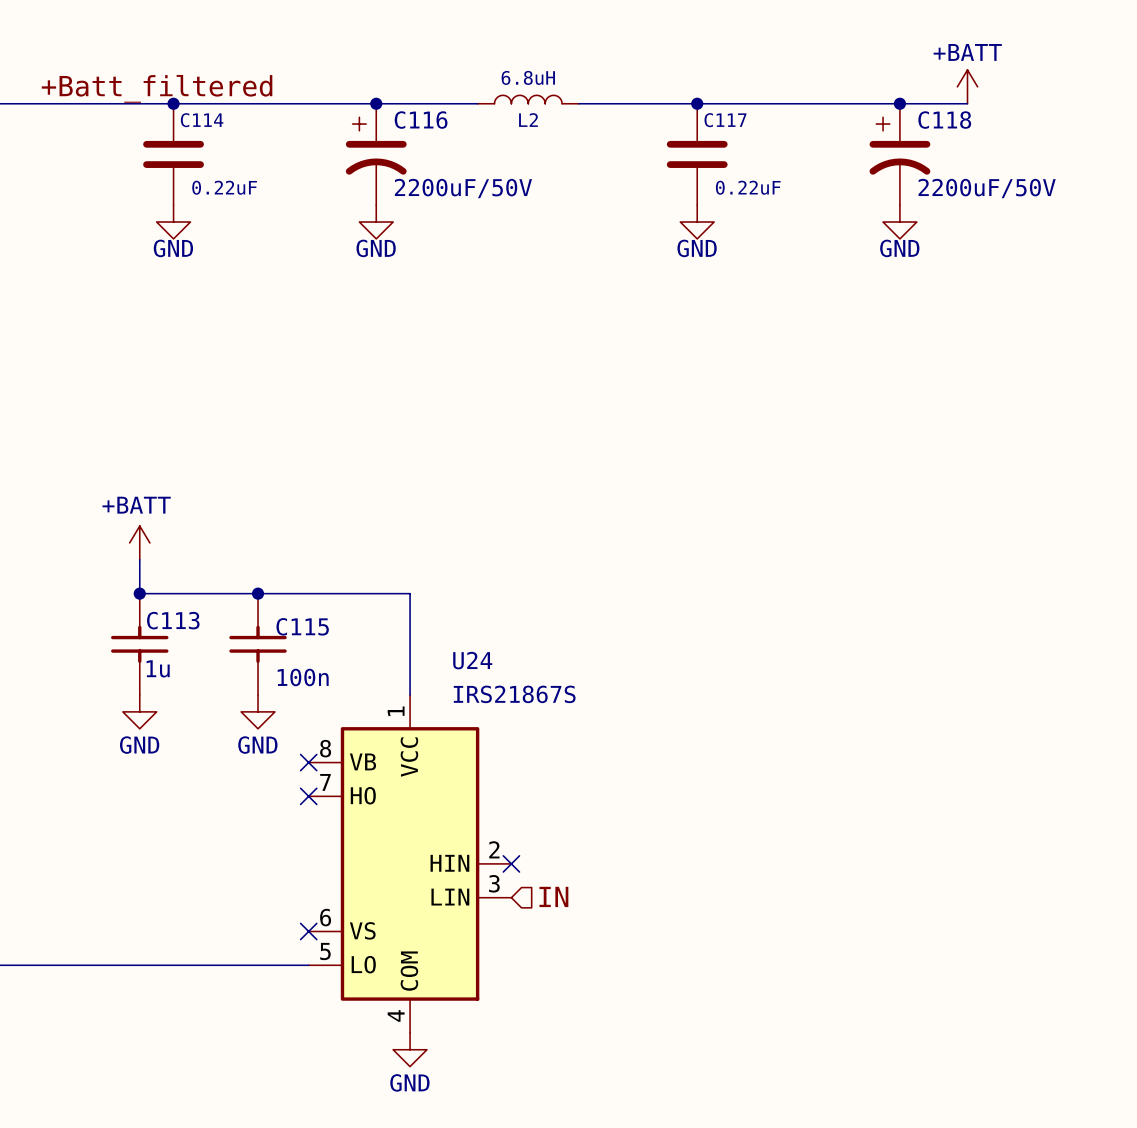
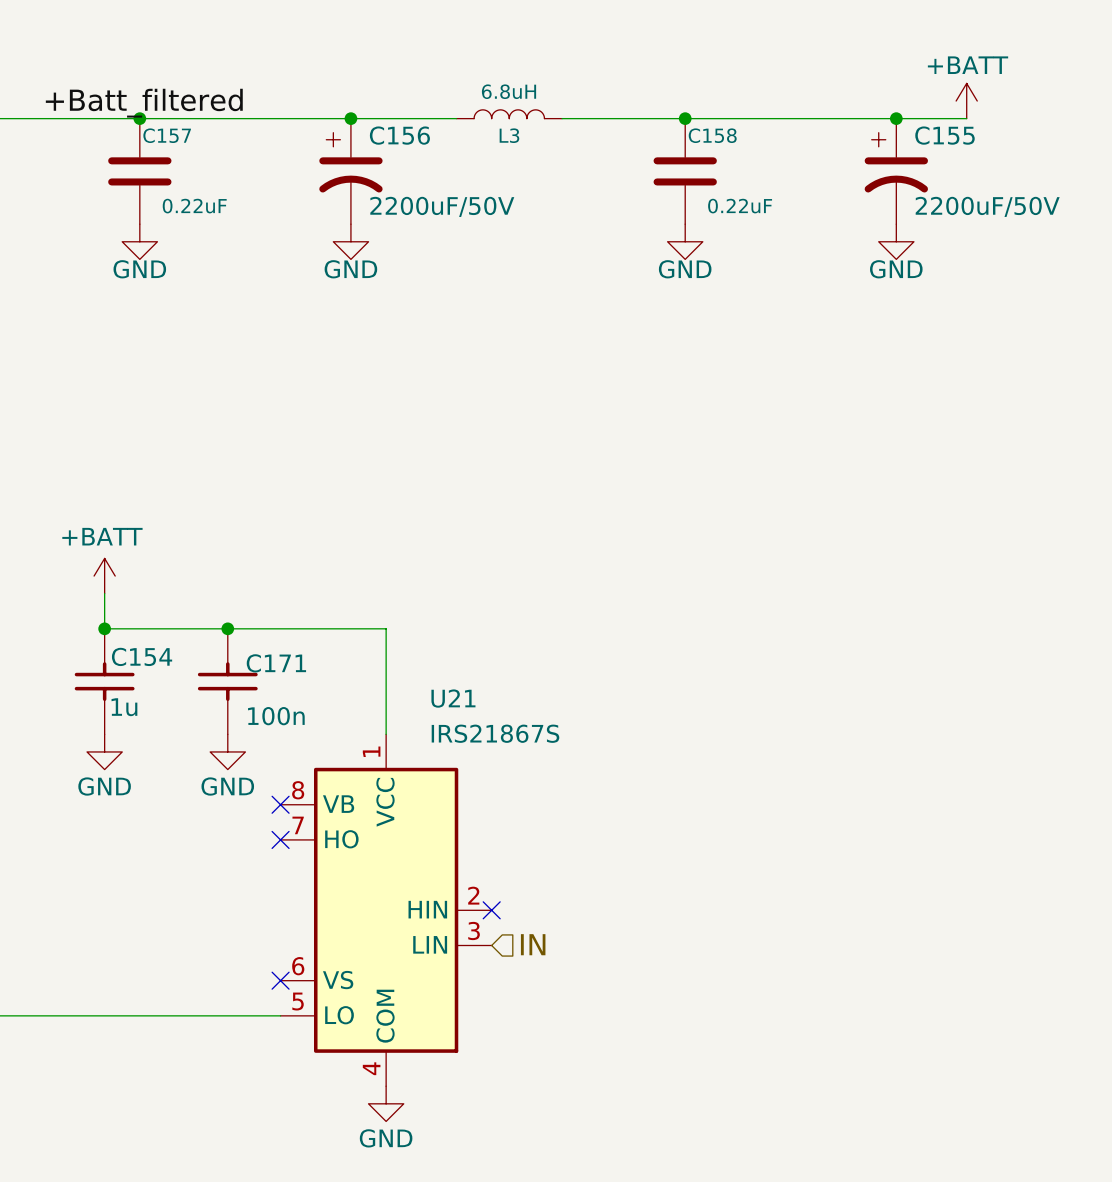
C114 name: C114 (202, 120) -> C157 (167, 135)
C116 name: C116 (421, 120) -> C156 (399, 135)
L2 name: L2 (528, 120) -> L3 (509, 135)
C117 name: C117 (725, 120) -> C158 (712, 135)
C118 name: C118 (944, 120) -> C155 (944, 135)
C113 name: C113 (173, 620) -> C154 (142, 656)
C115 name: C115 (302, 626) -> C171 (276, 663)
U24 name: U24 (472, 660) -> U21 (453, 698)

